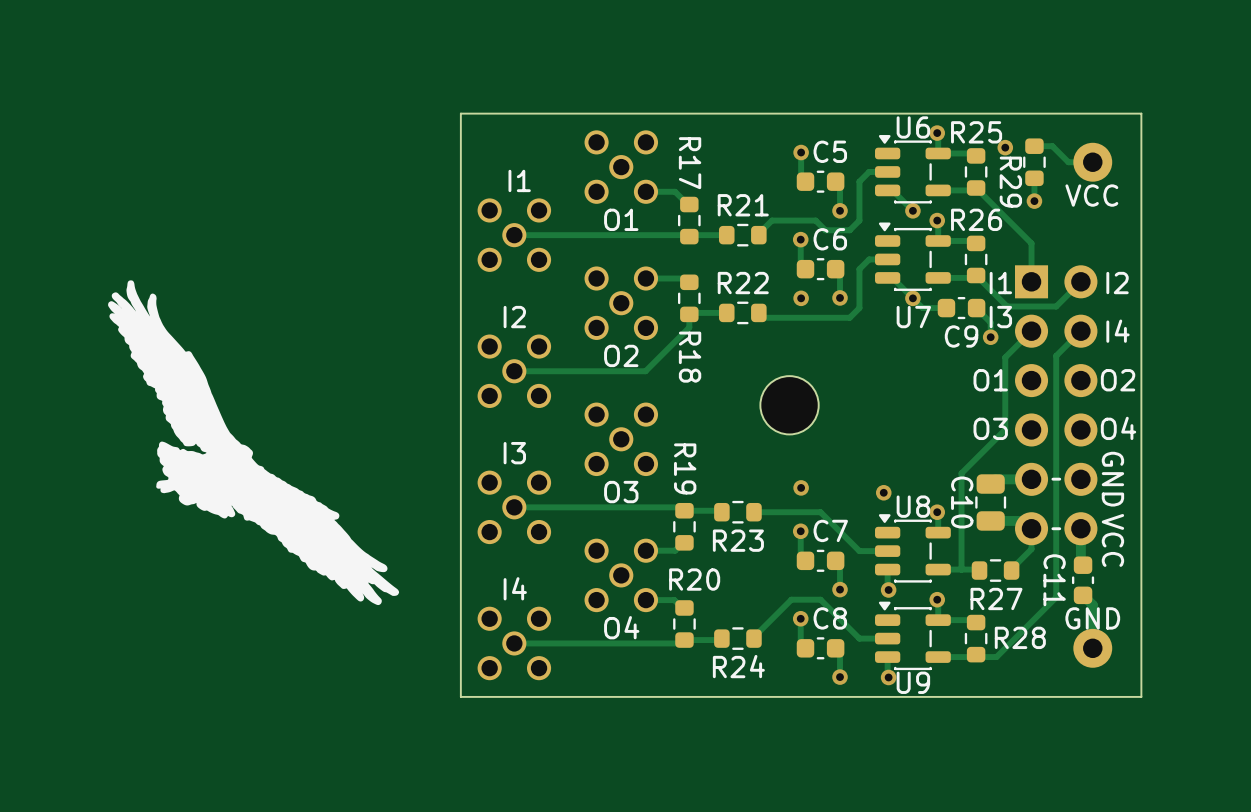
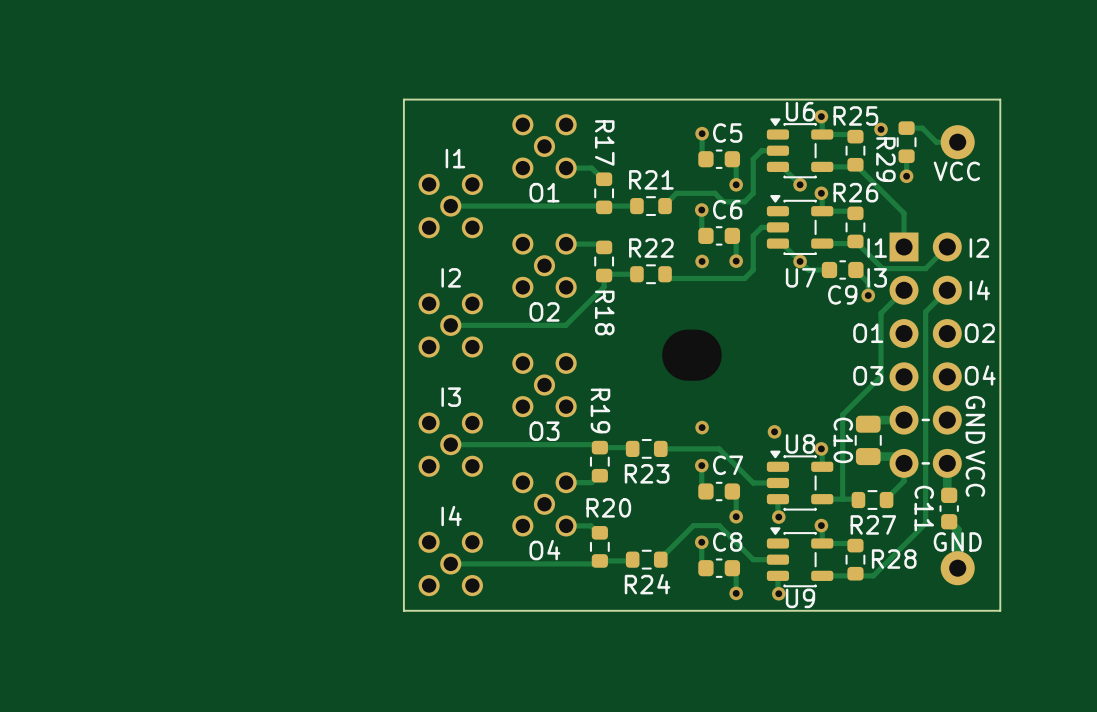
drawing: [108, 280, 400, 606] -> none
part footprint: [760, 376, 819, 435] -> [662, 329, 722, 381]

